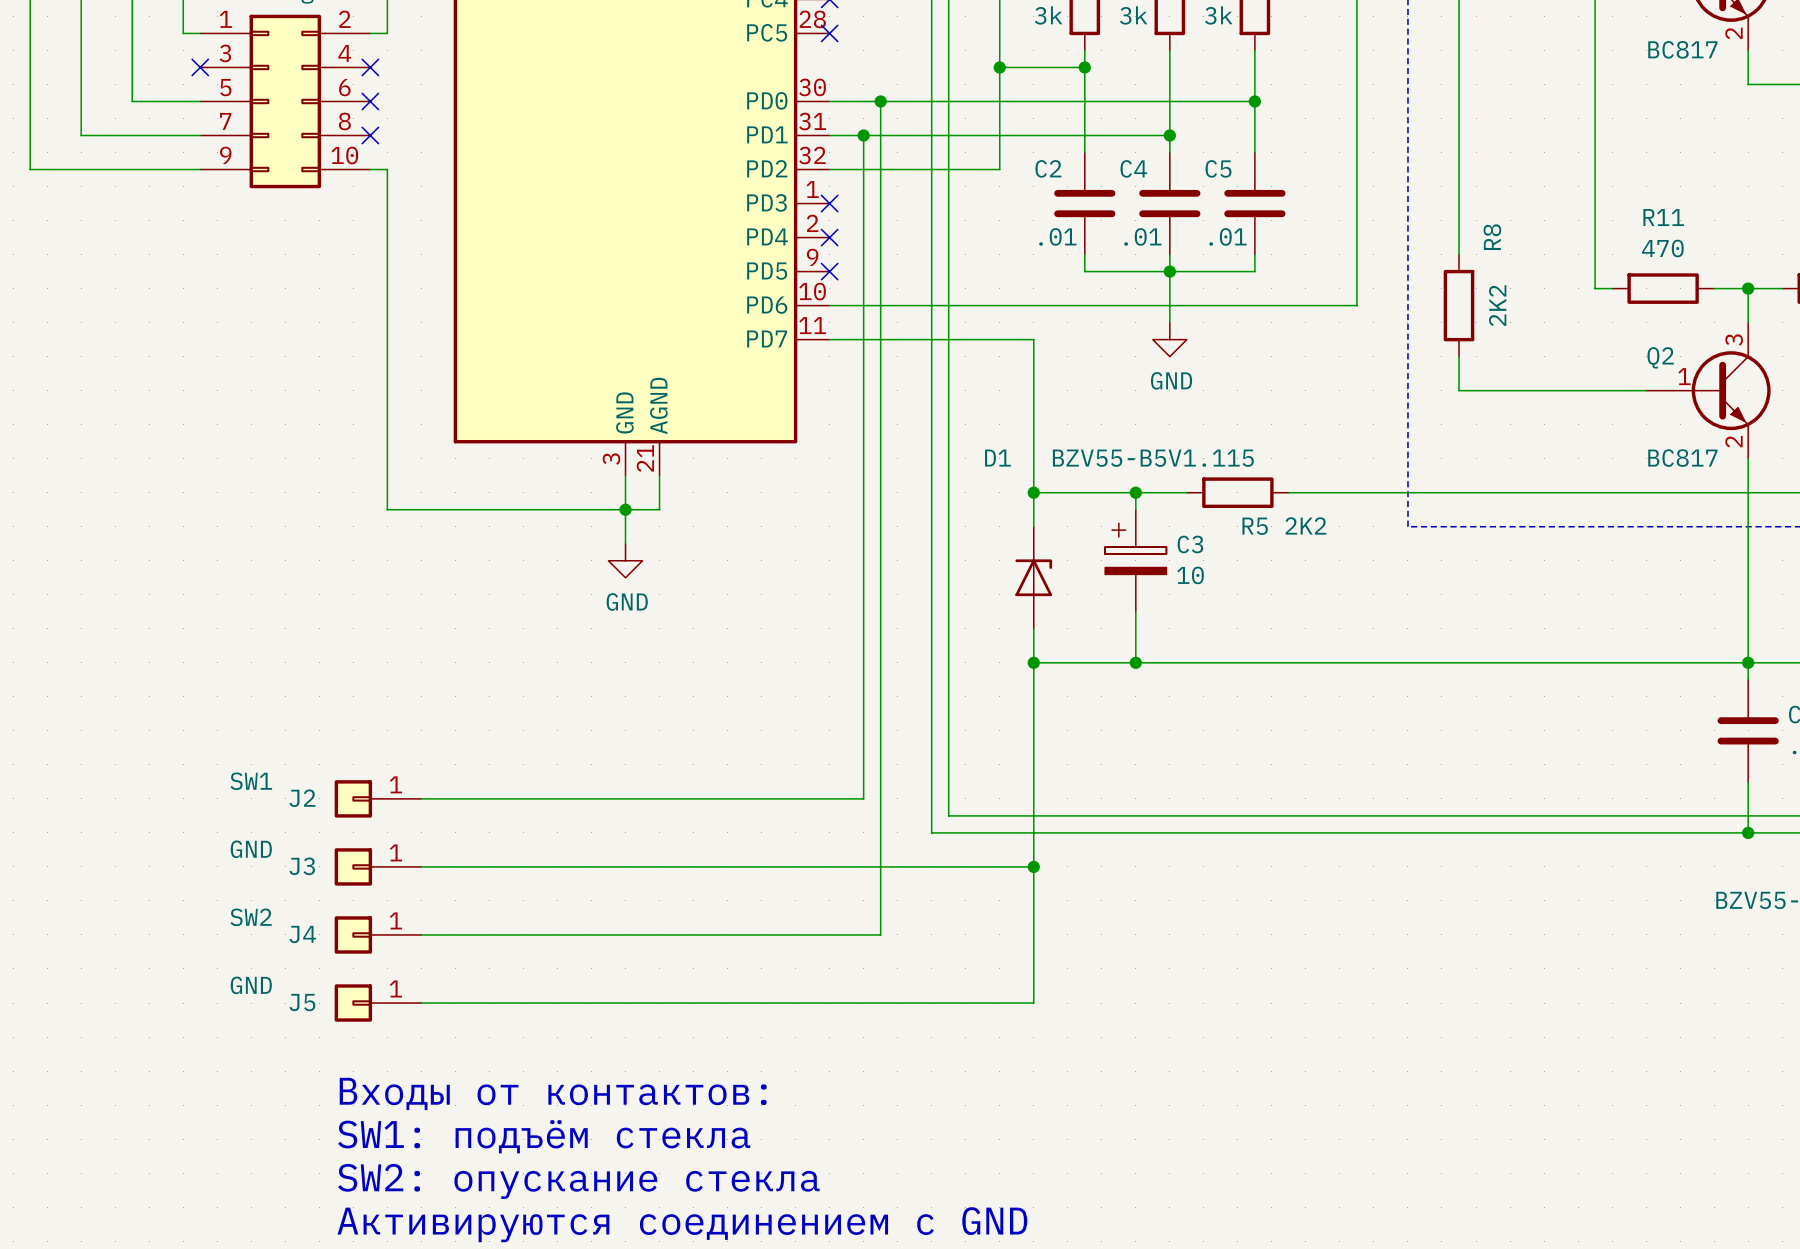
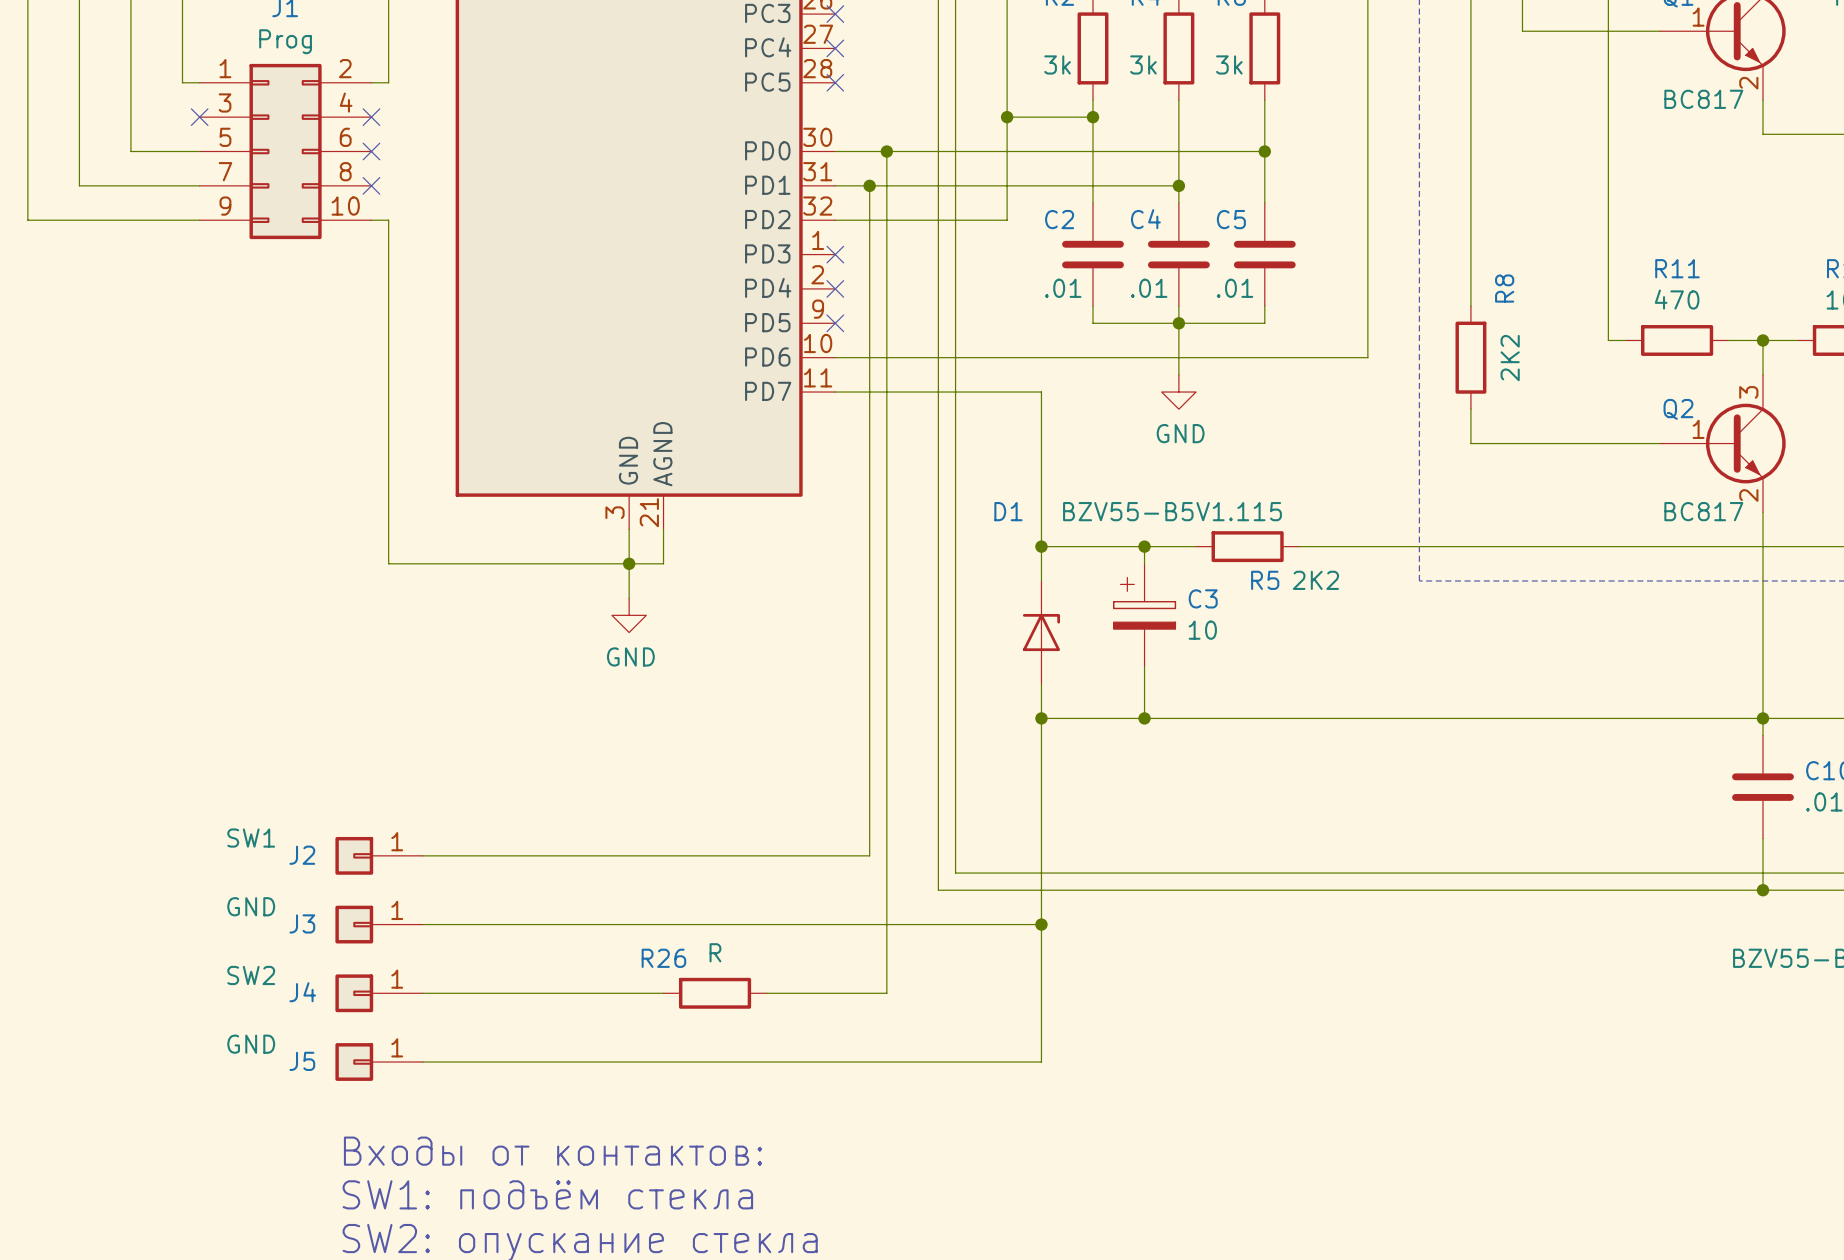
wire: (659, 934) (761, 934) -> none
R26: none -> R (715, 993)

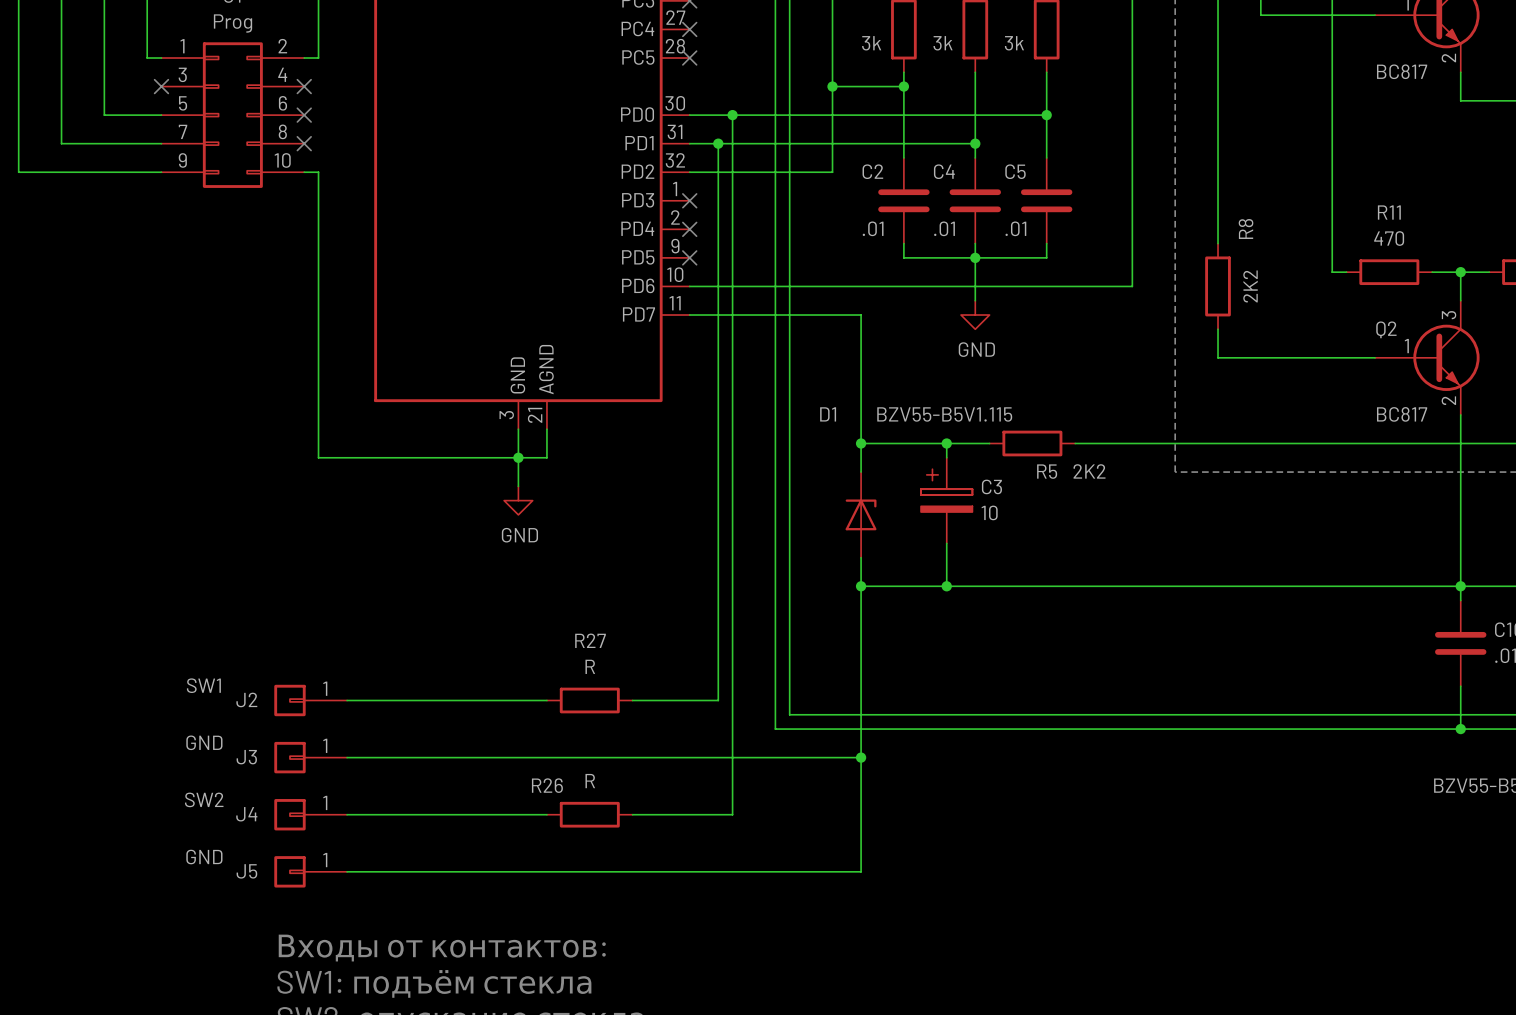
wire: (663, 855) (766, 855) -> none
R27: none -> R (589, 700)

